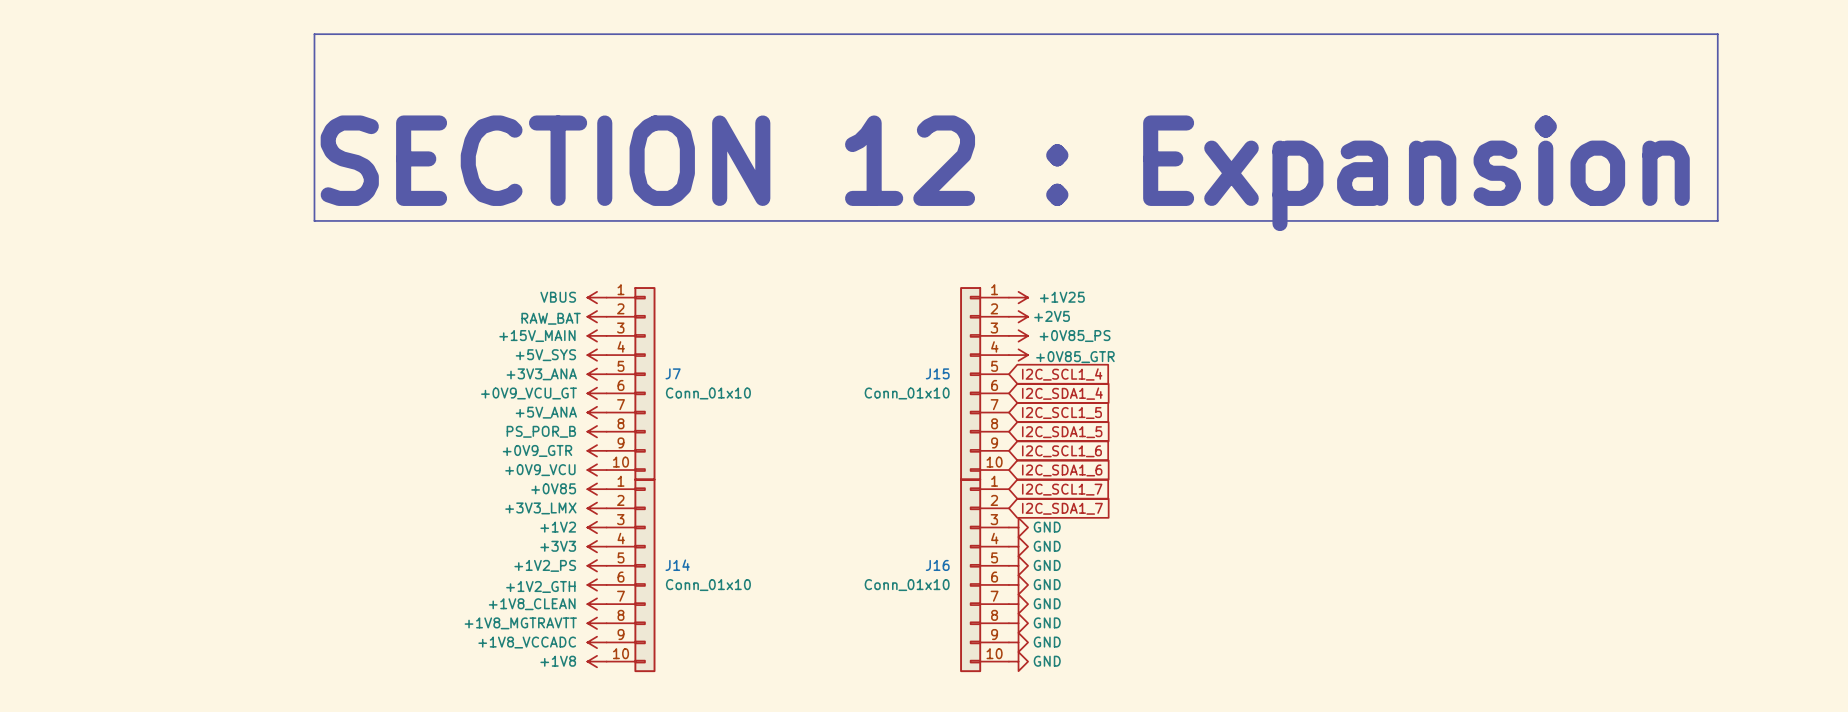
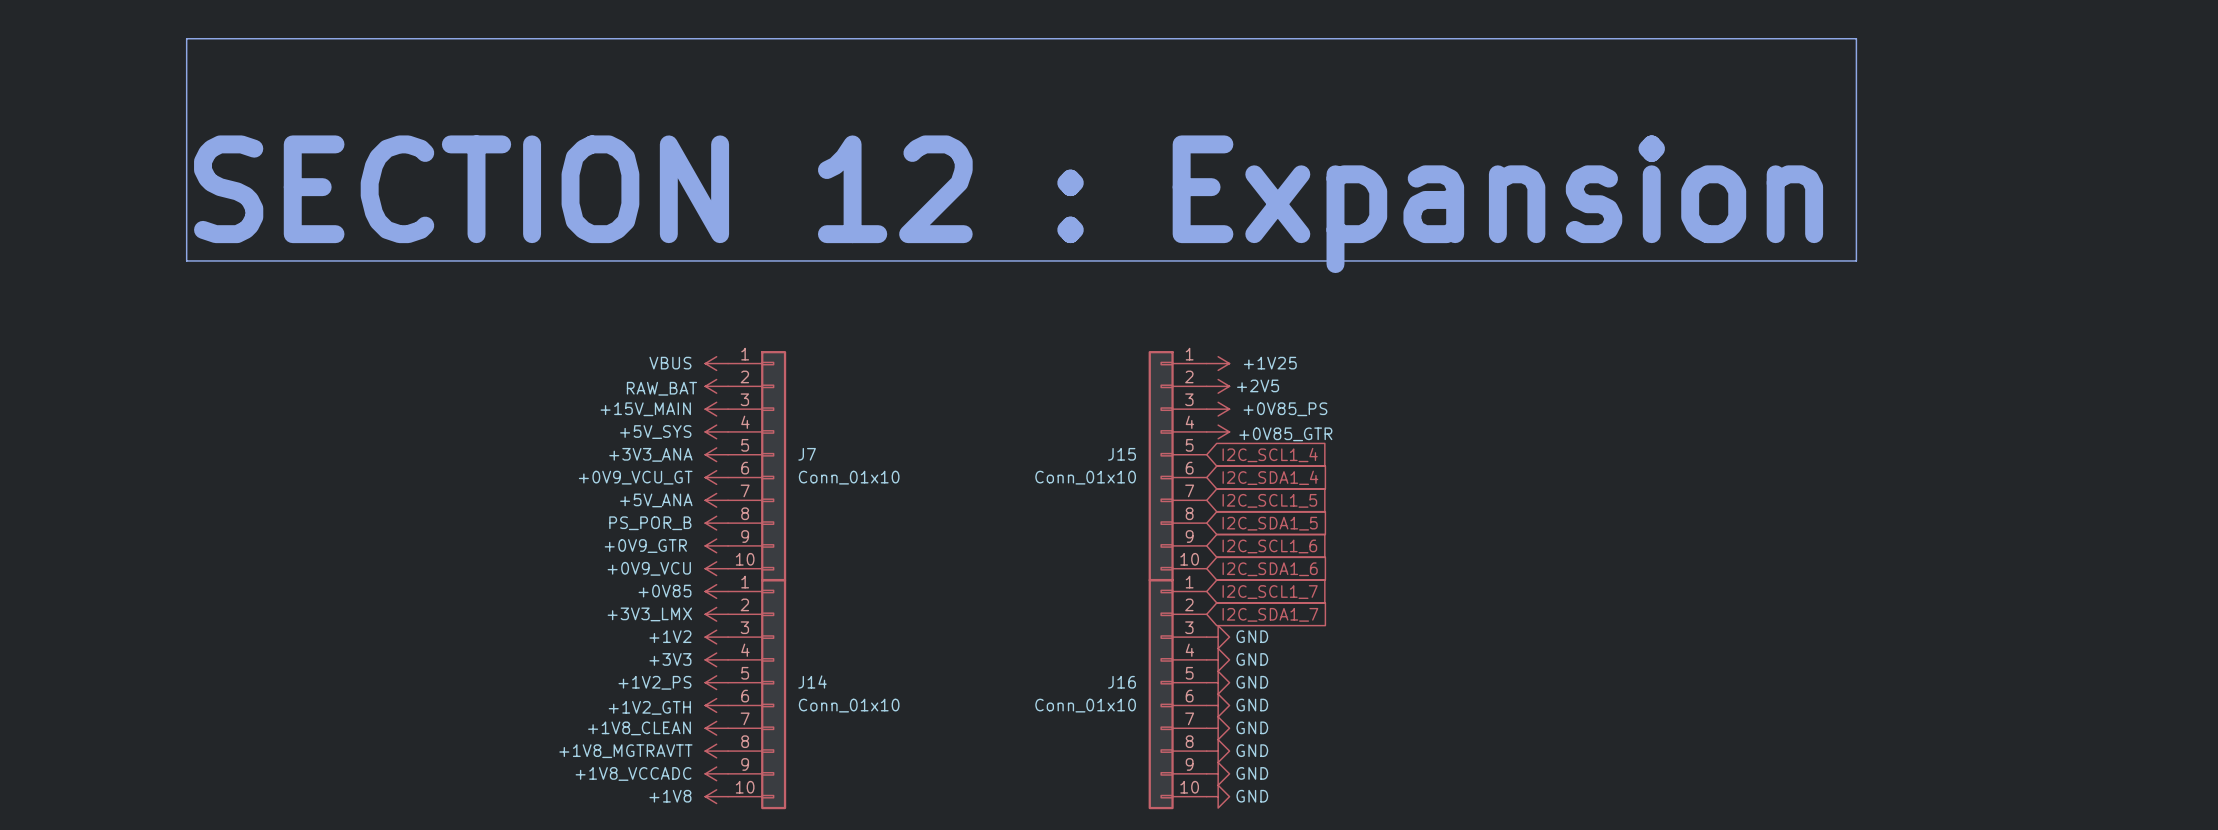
line: (314, 34) (1717, 34) (1717, 220) (314, 220) (314, 34) -> (186, 38) (186, 260) (1856, 260) (1856, 38) (186, 38)
text position: SECTION 12 : Expansion (1005, 173) -> SECTION 12 : Expansion (1008, 204)

